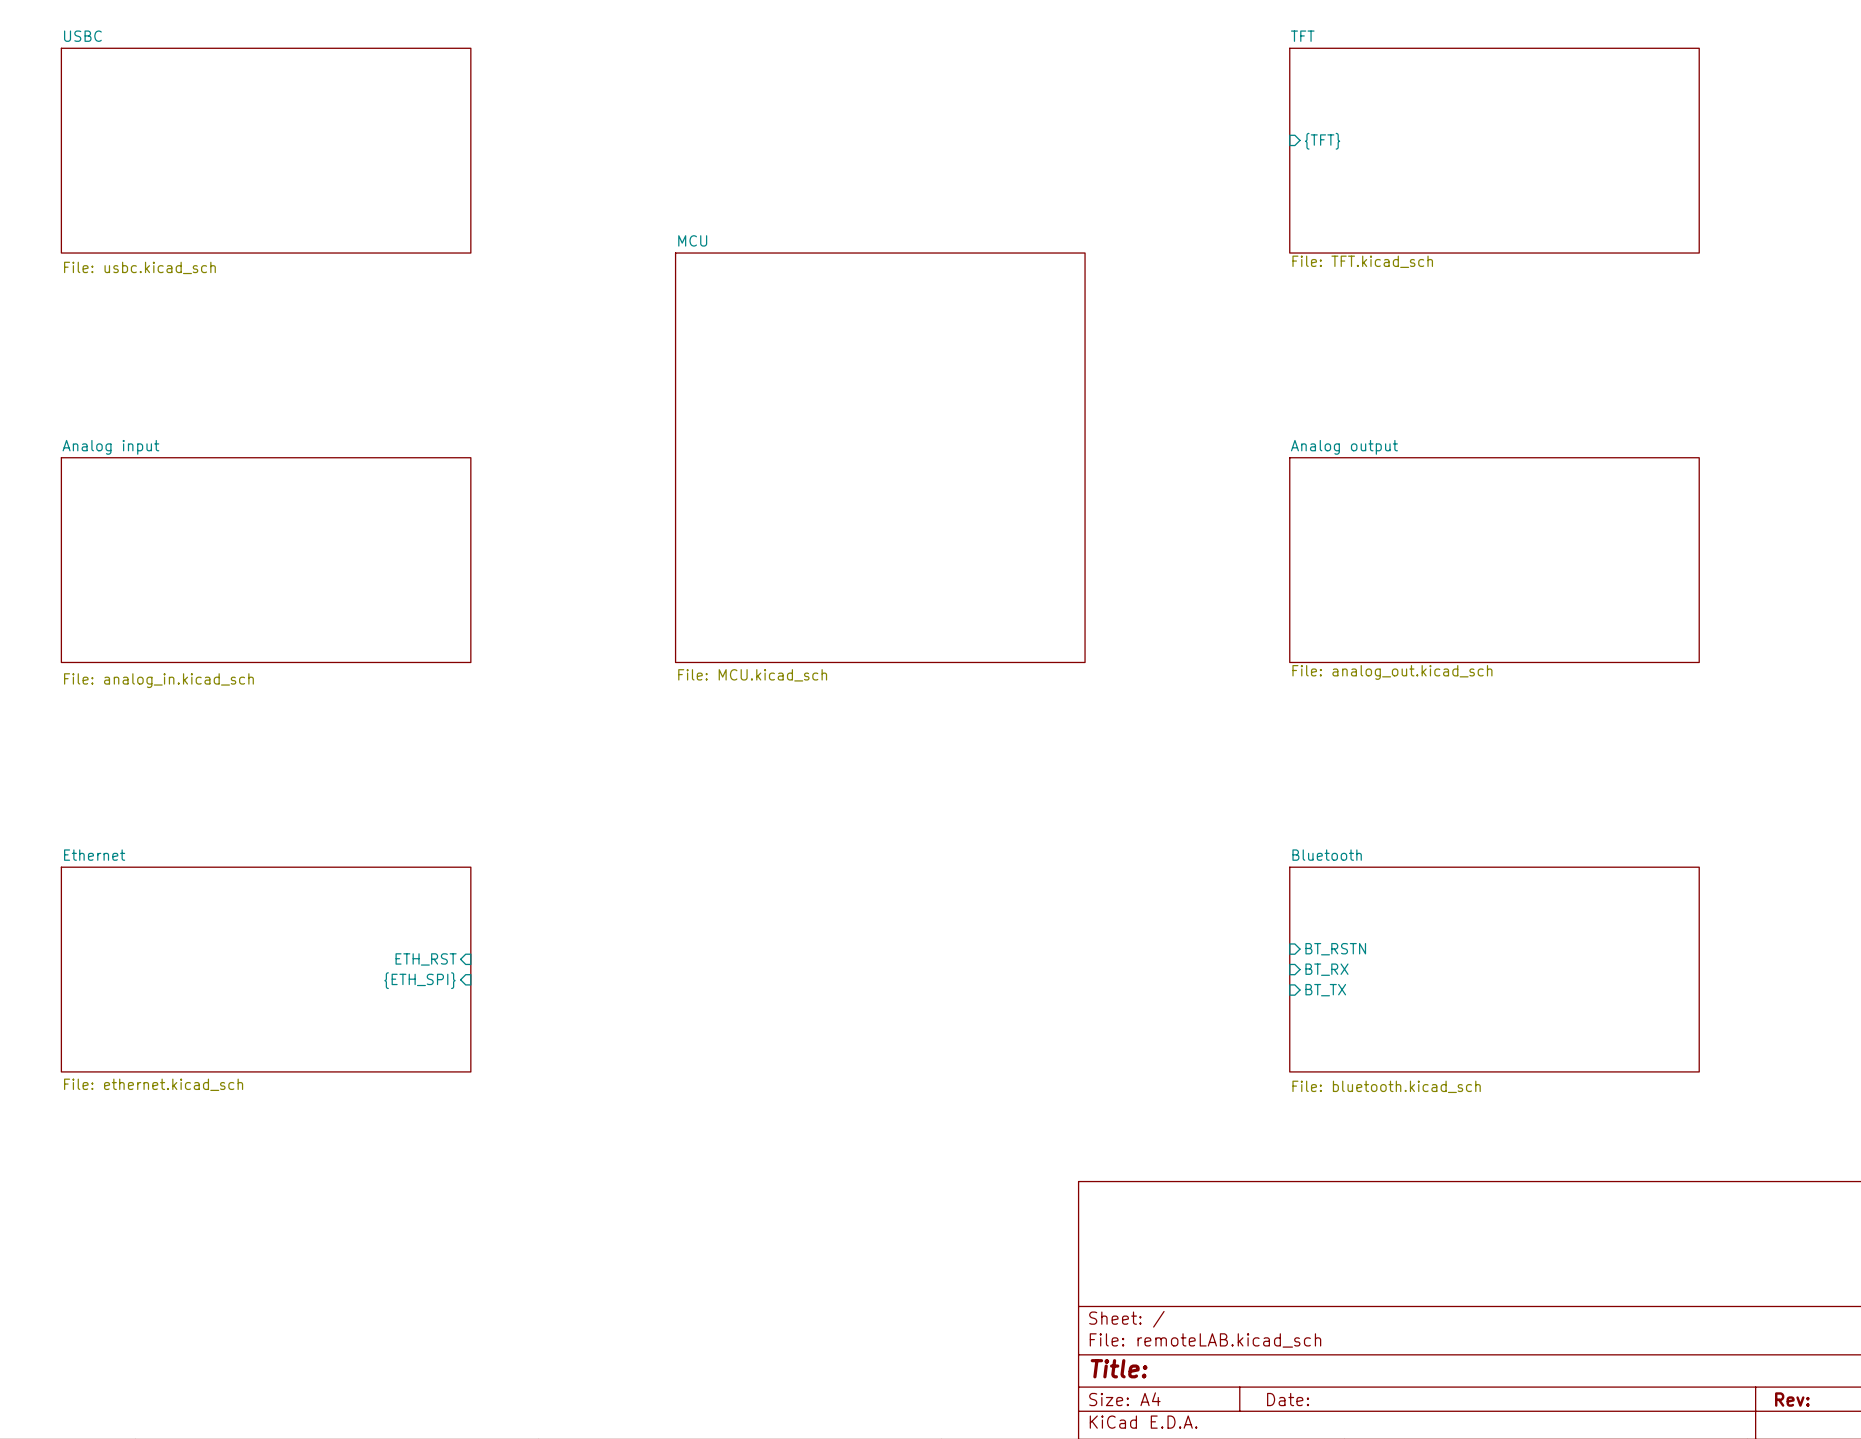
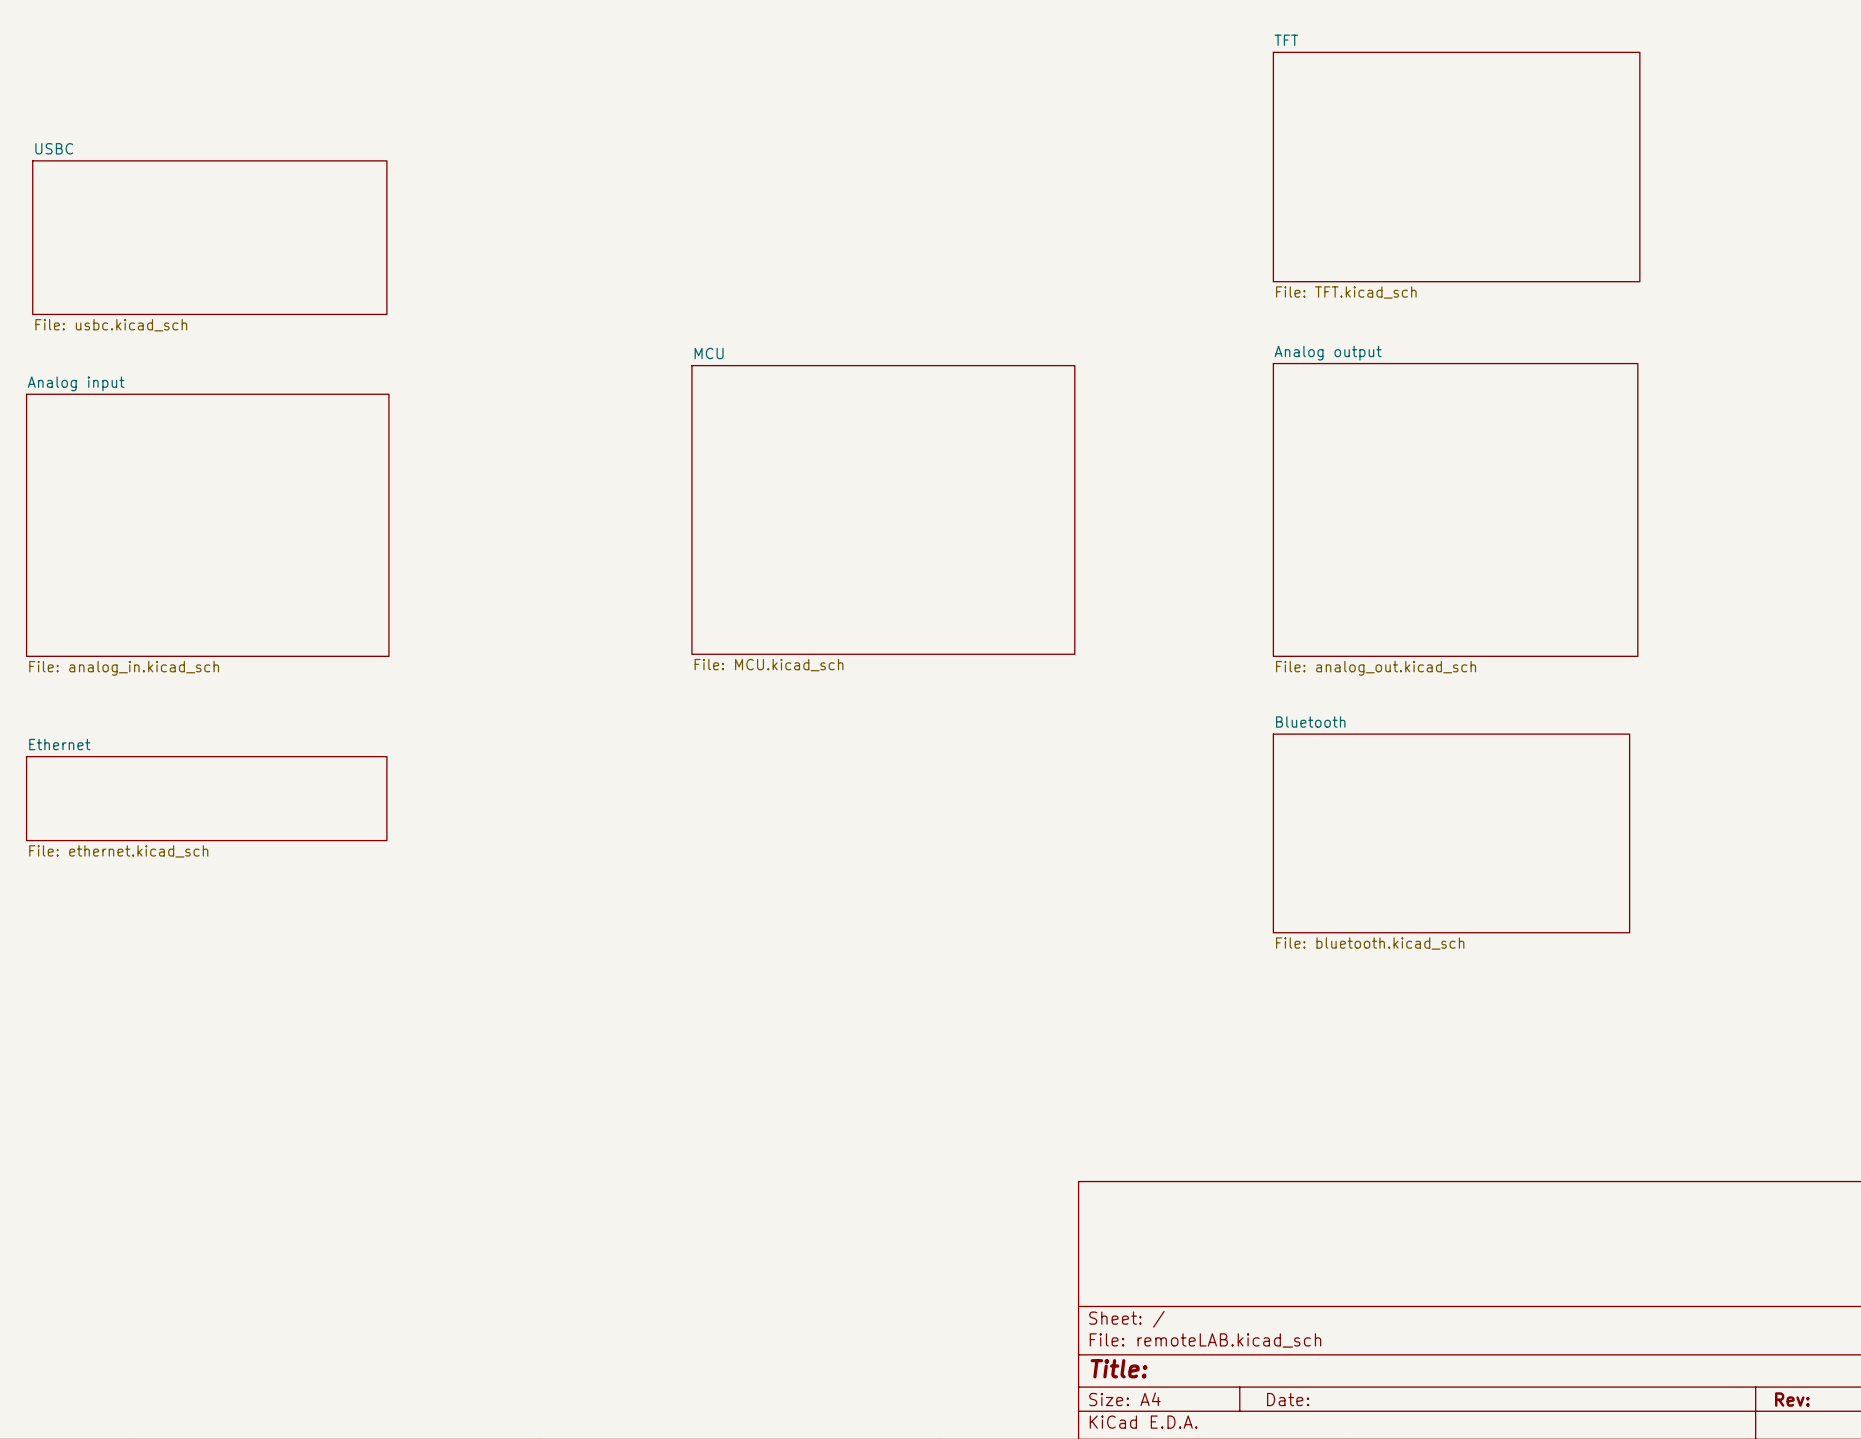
sheet pin: {TFT} (1322, 141) -> none
sheet USBC: File: usbc.kicad_sch (266, 150) -> none
sheet TFT: File: TFT.kicad_sch (1494, 150) -> none
sheet TFT: none -> File: TFT.kicad_sch (1456, 167)
sheet USBC: none -> File: usbc.kicad_sch (209, 237)
sheet MCU: File: MCU.kicad_sch (880, 457) -> none
sheet MCU: none -> File: MCU.kicad_sch (883, 509)
sheet Analog output: none -> File: analog_out.kicad_sch (1455, 509)
sheet Analog input: none -> File: analog_in.kicad_sch (207, 525)
sheet Analog input: File: analog_in.kicad_sch (266, 560) -> none
sheet Analog output: File: analog_out.kicad_sch (1494, 560) -> none
sheet Ethernet: none -> File: ethernet.kicad_sch (206, 798)
sheet Bluetooth: none -> File: bluetooth.kicad_sch (1451, 833)
sheet pin: BT_RSTN (1335, 949) -> none
sheet pin: ETH_RST (426, 959) -> none
sheet Ethernet: File: ethernet.kicad_sch (266, 969) -> none
sheet pin: BT_RX (1326, 969) -> none
sheet Bluetooth: File: bluetooth.kicad_sch (1494, 969) -> none
sheet pin: {ETH_SPI} (419, 980) -> none
sheet pin: BT_TX (1325, 990) -> none

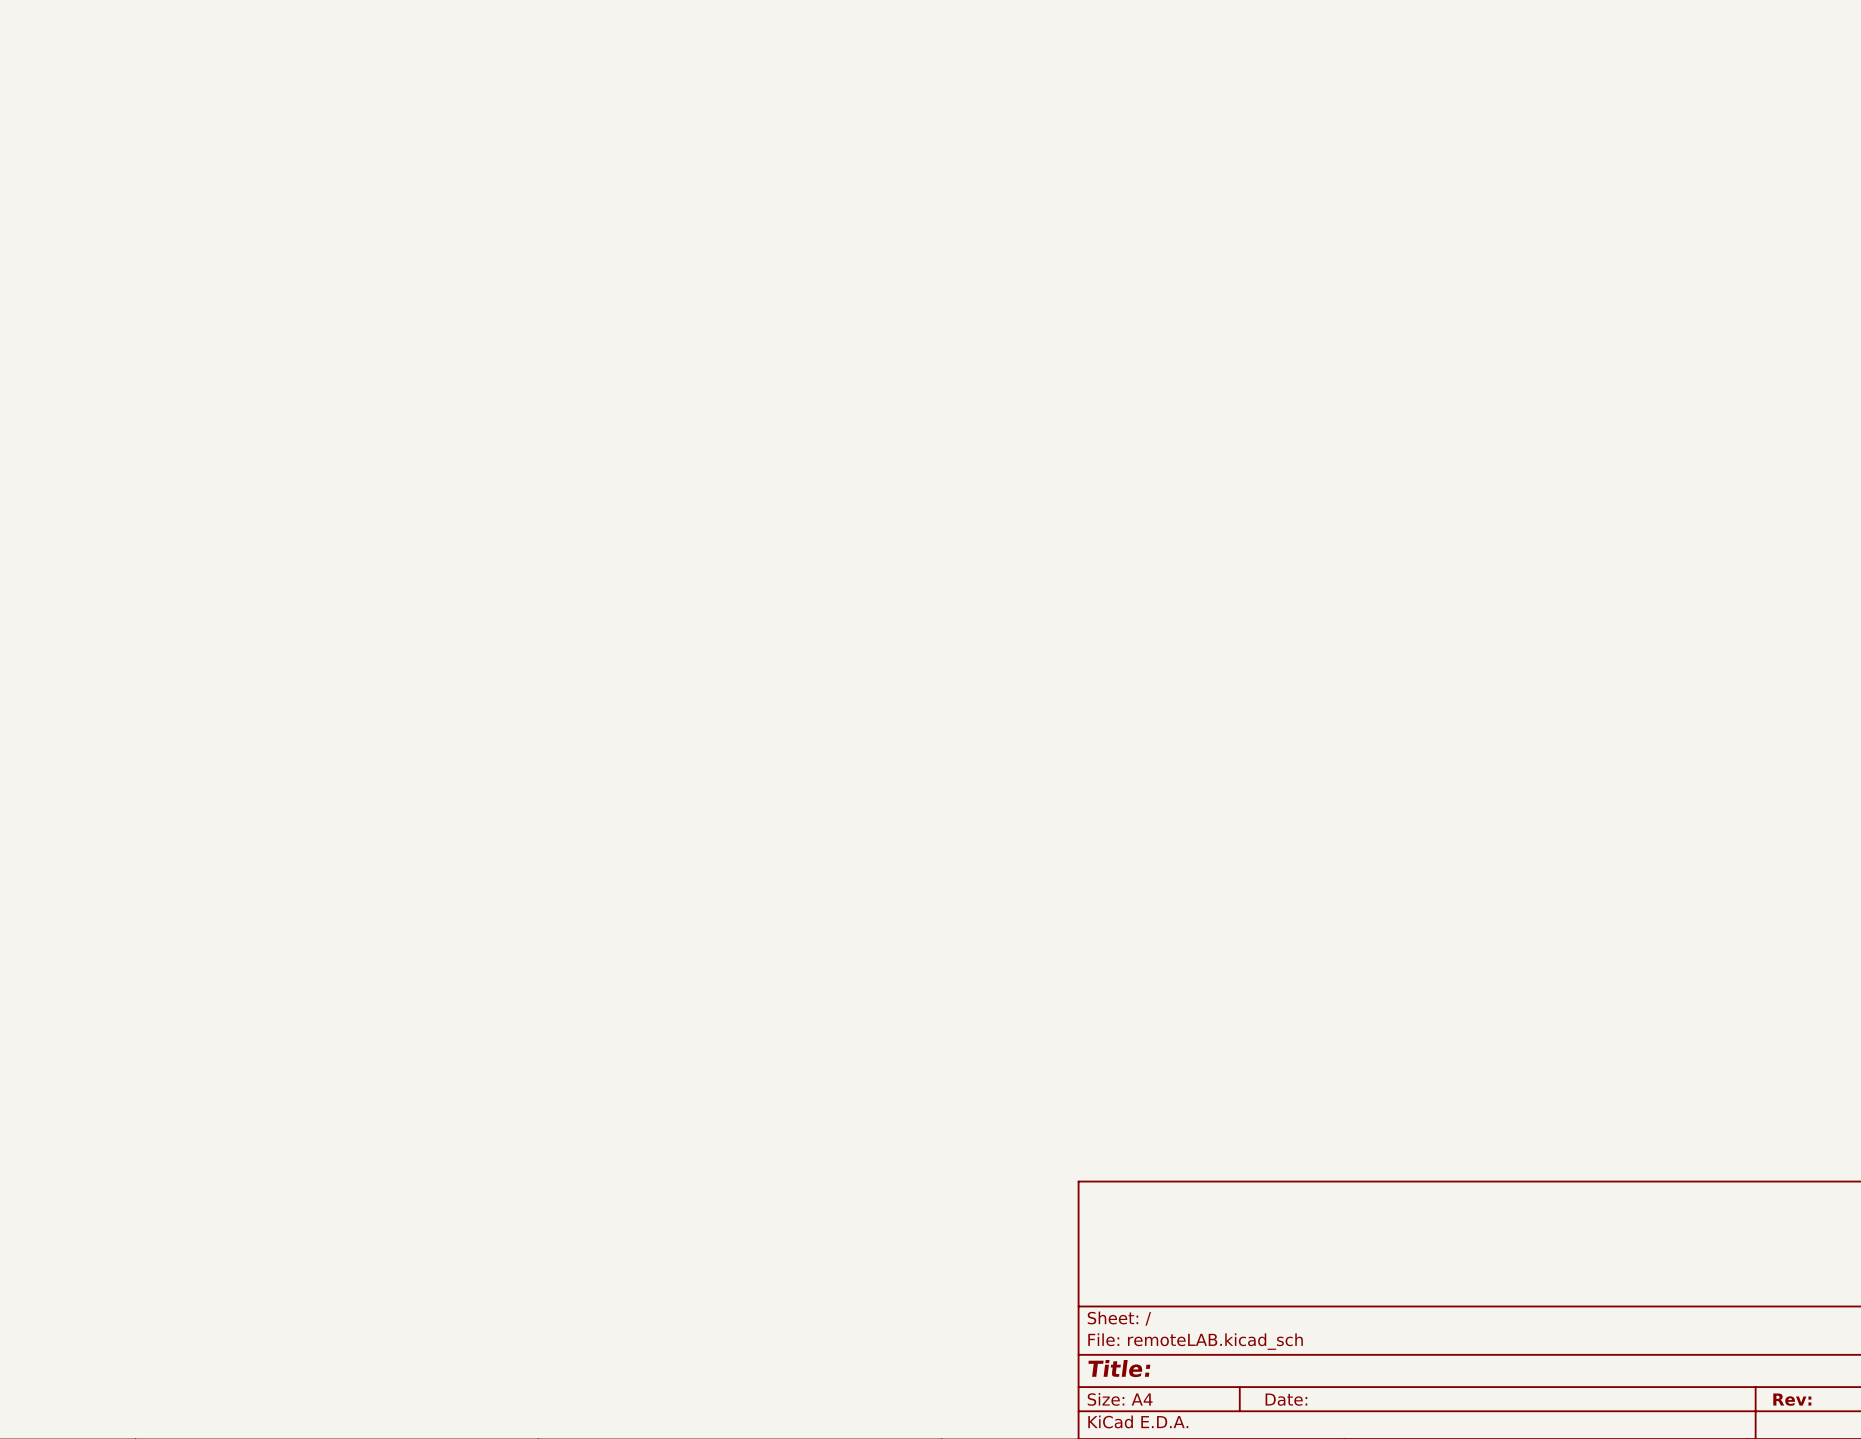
sheet TFT: File: TFT.kicad_sch (1456, 167) -> none
sheet USBC: File: usbc.kicad_sch (209, 237) -> none
sheet MCU: File: MCU.kicad_sch (883, 509) -> none
sheet Analog output: File: analog_out.kicad_sch (1455, 509) -> none
sheet Analog input: File: analog_in.kicad_sch (207, 525) -> none
sheet Ethernet: File: ethernet.kicad_sch (206, 798) -> none
sheet Bluetooth: File: bluetooth.kicad_sch (1451, 833) -> none

